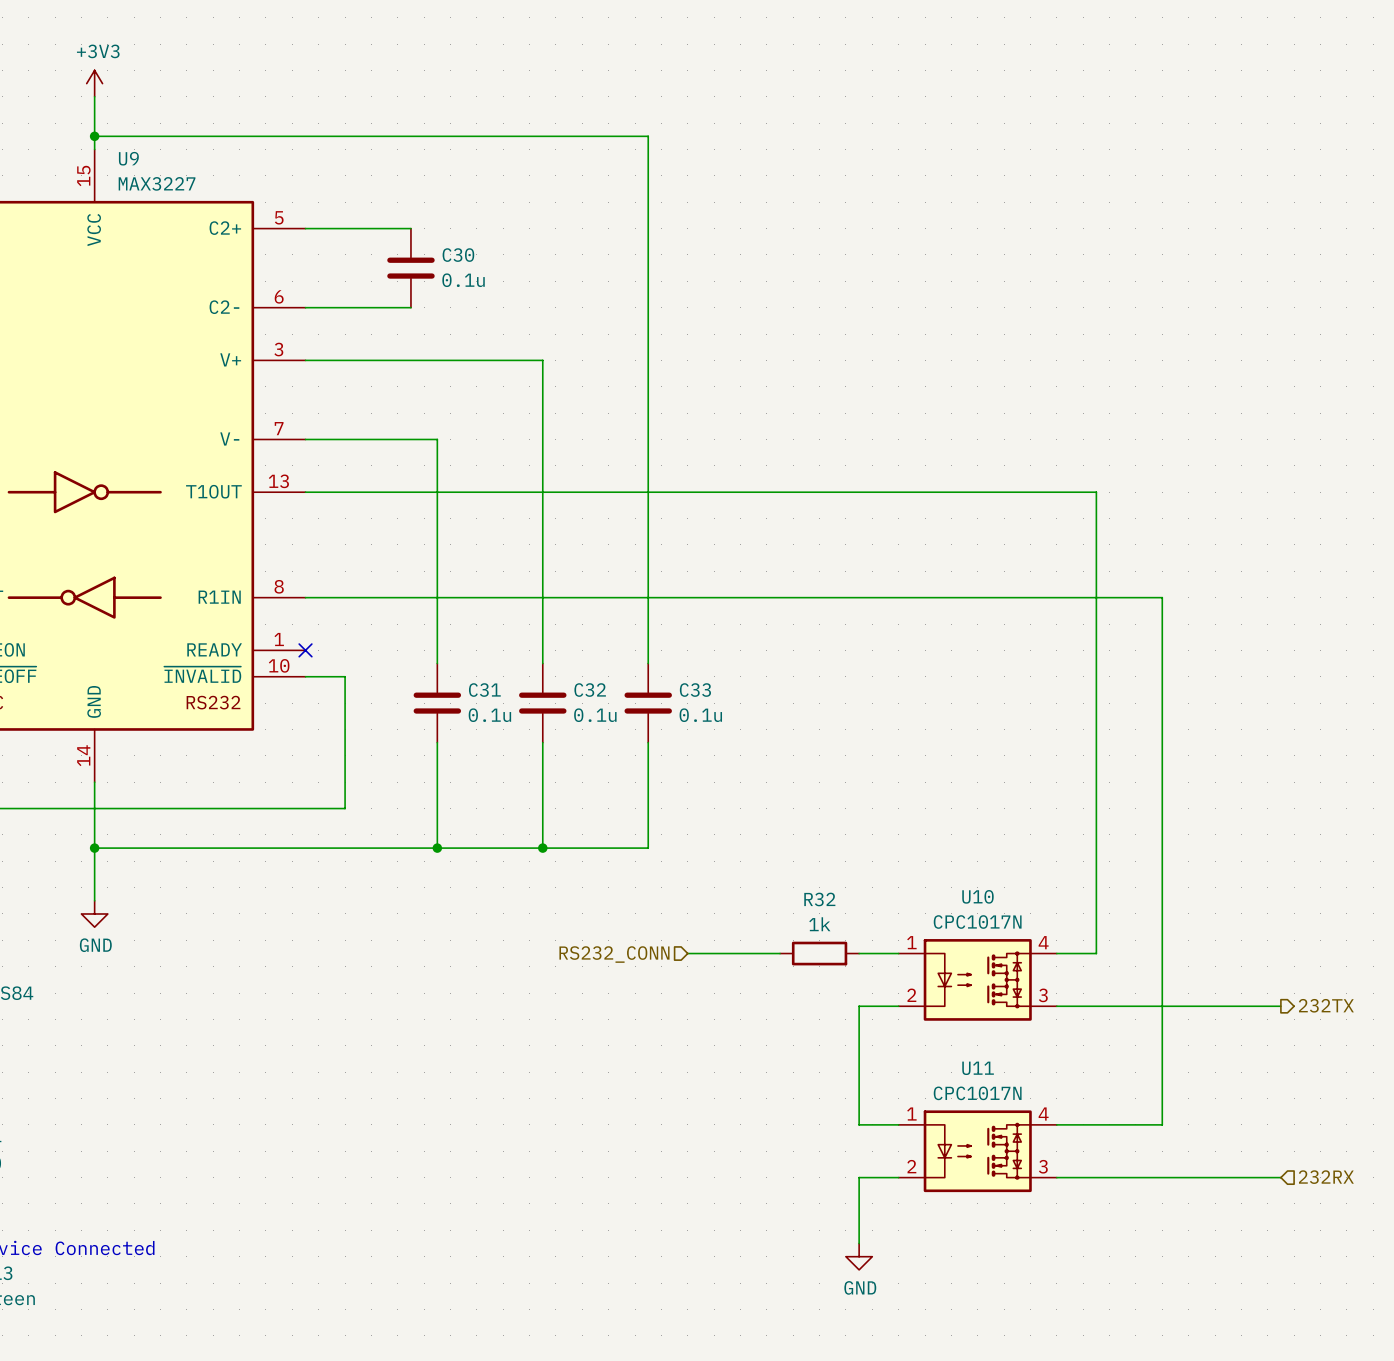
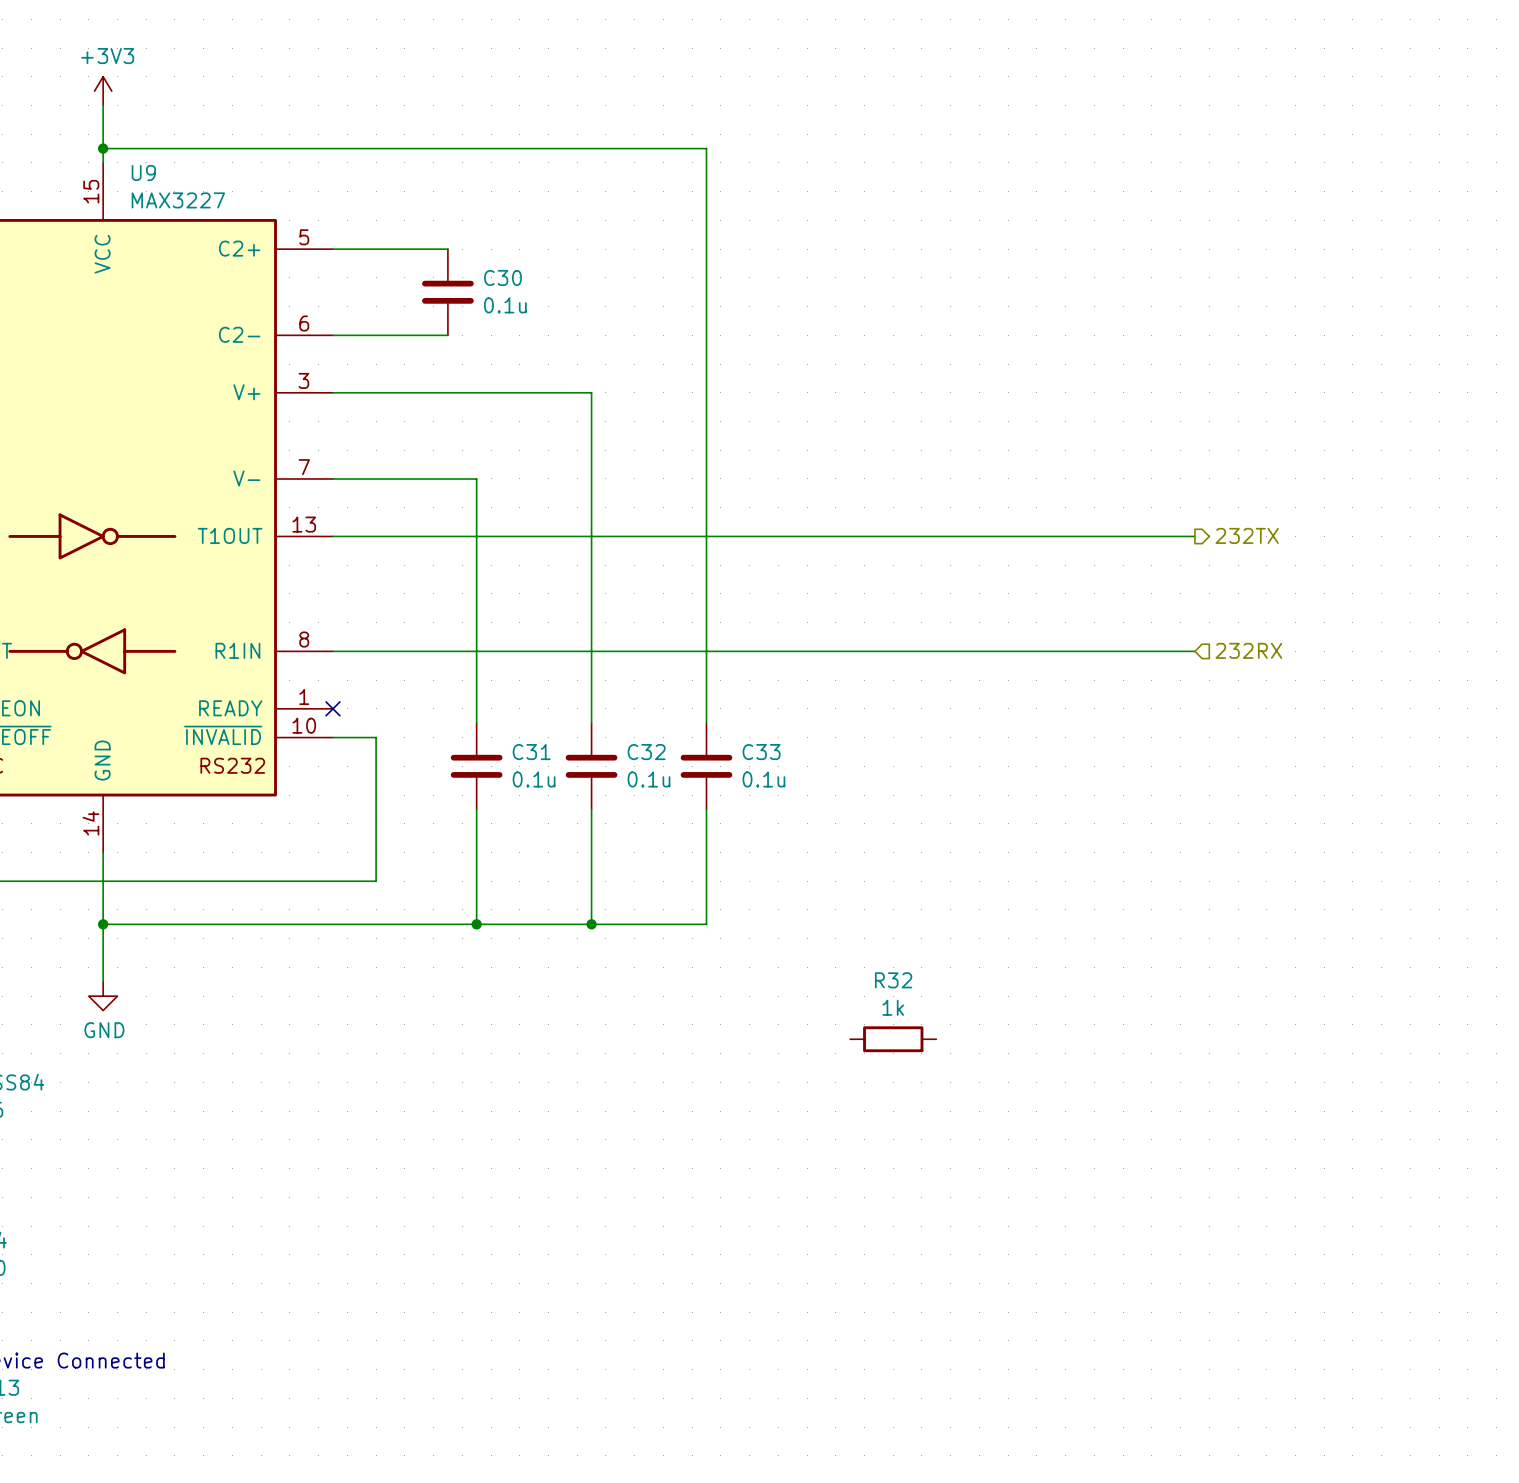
hierarchical label: none -> 232TX (1247, 535)
wire: (1096, 492) (1096, 953) (1056, 953) -> none
wire: (1096, 597) (1162, 597) (1162, 1124) (1056, 1124) -> none
hierarchical label: none -> 232RX (1248, 650)
wire: (687, 953) (780, 953) -> none
wire: (859, 953) (898, 953) -> none
hierarchical label: RS232_CONN (614, 954) -> none
U10: CPC1017N (977, 979) -> none
hierarchical label: 232TX (1326, 1005) -> none
wire: (898, 1006) (859, 1006) (859, 1124) (898, 1124) -> none
wire: (1056, 1006) (1280, 1006) -> none
U11: CPC1017N (977, 1151) -> none
wire: (898, 1177) (859, 1177) (859, 1243) -> none
wire: (1056, 1177) (1280, 1177) -> none
hierarchical label: 232RX (1326, 1177) -> none
power symbol: GND (859, 1256) -> none

